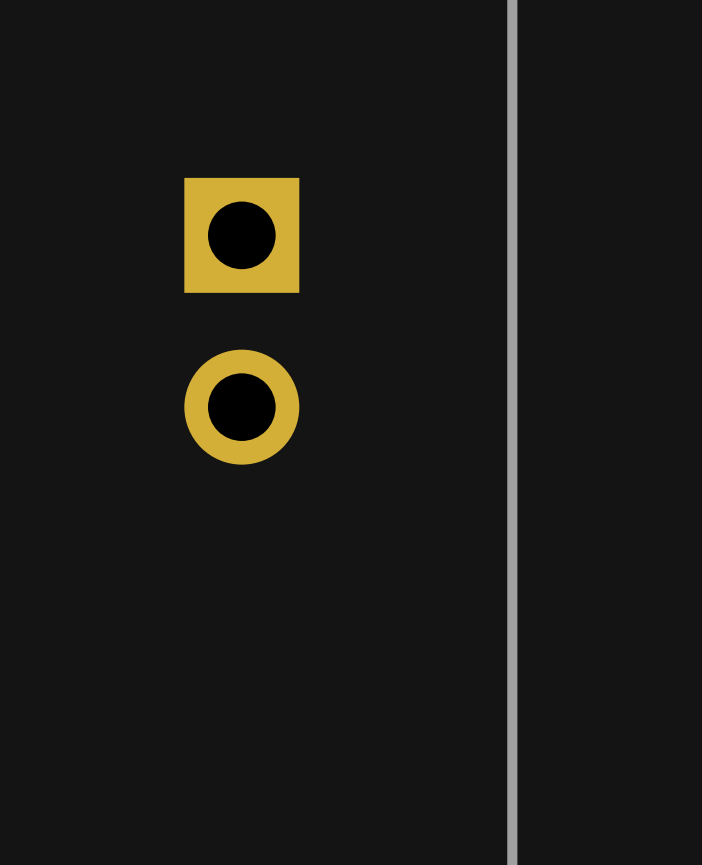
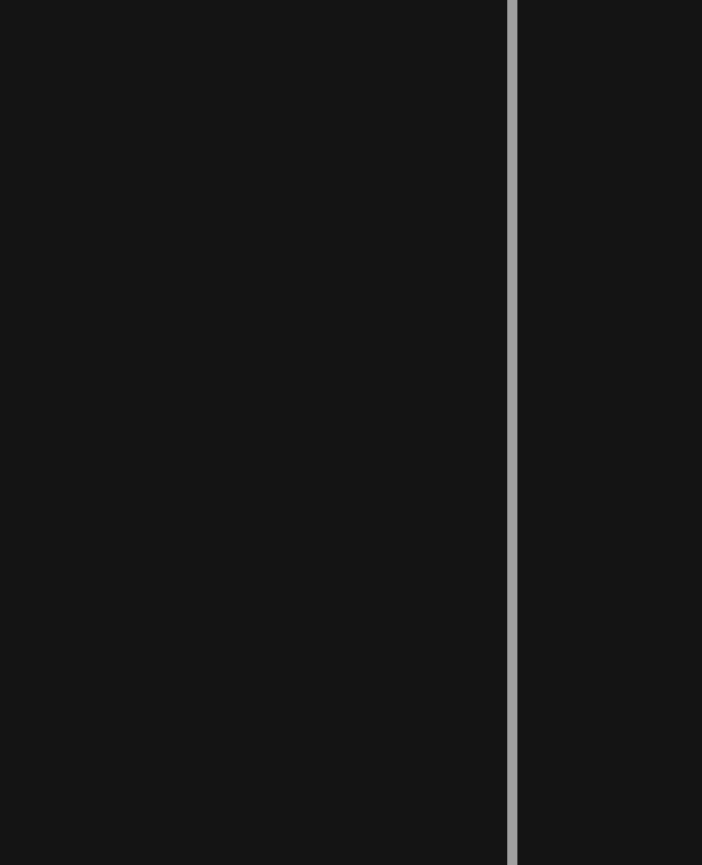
part: (241, 321) -> none

